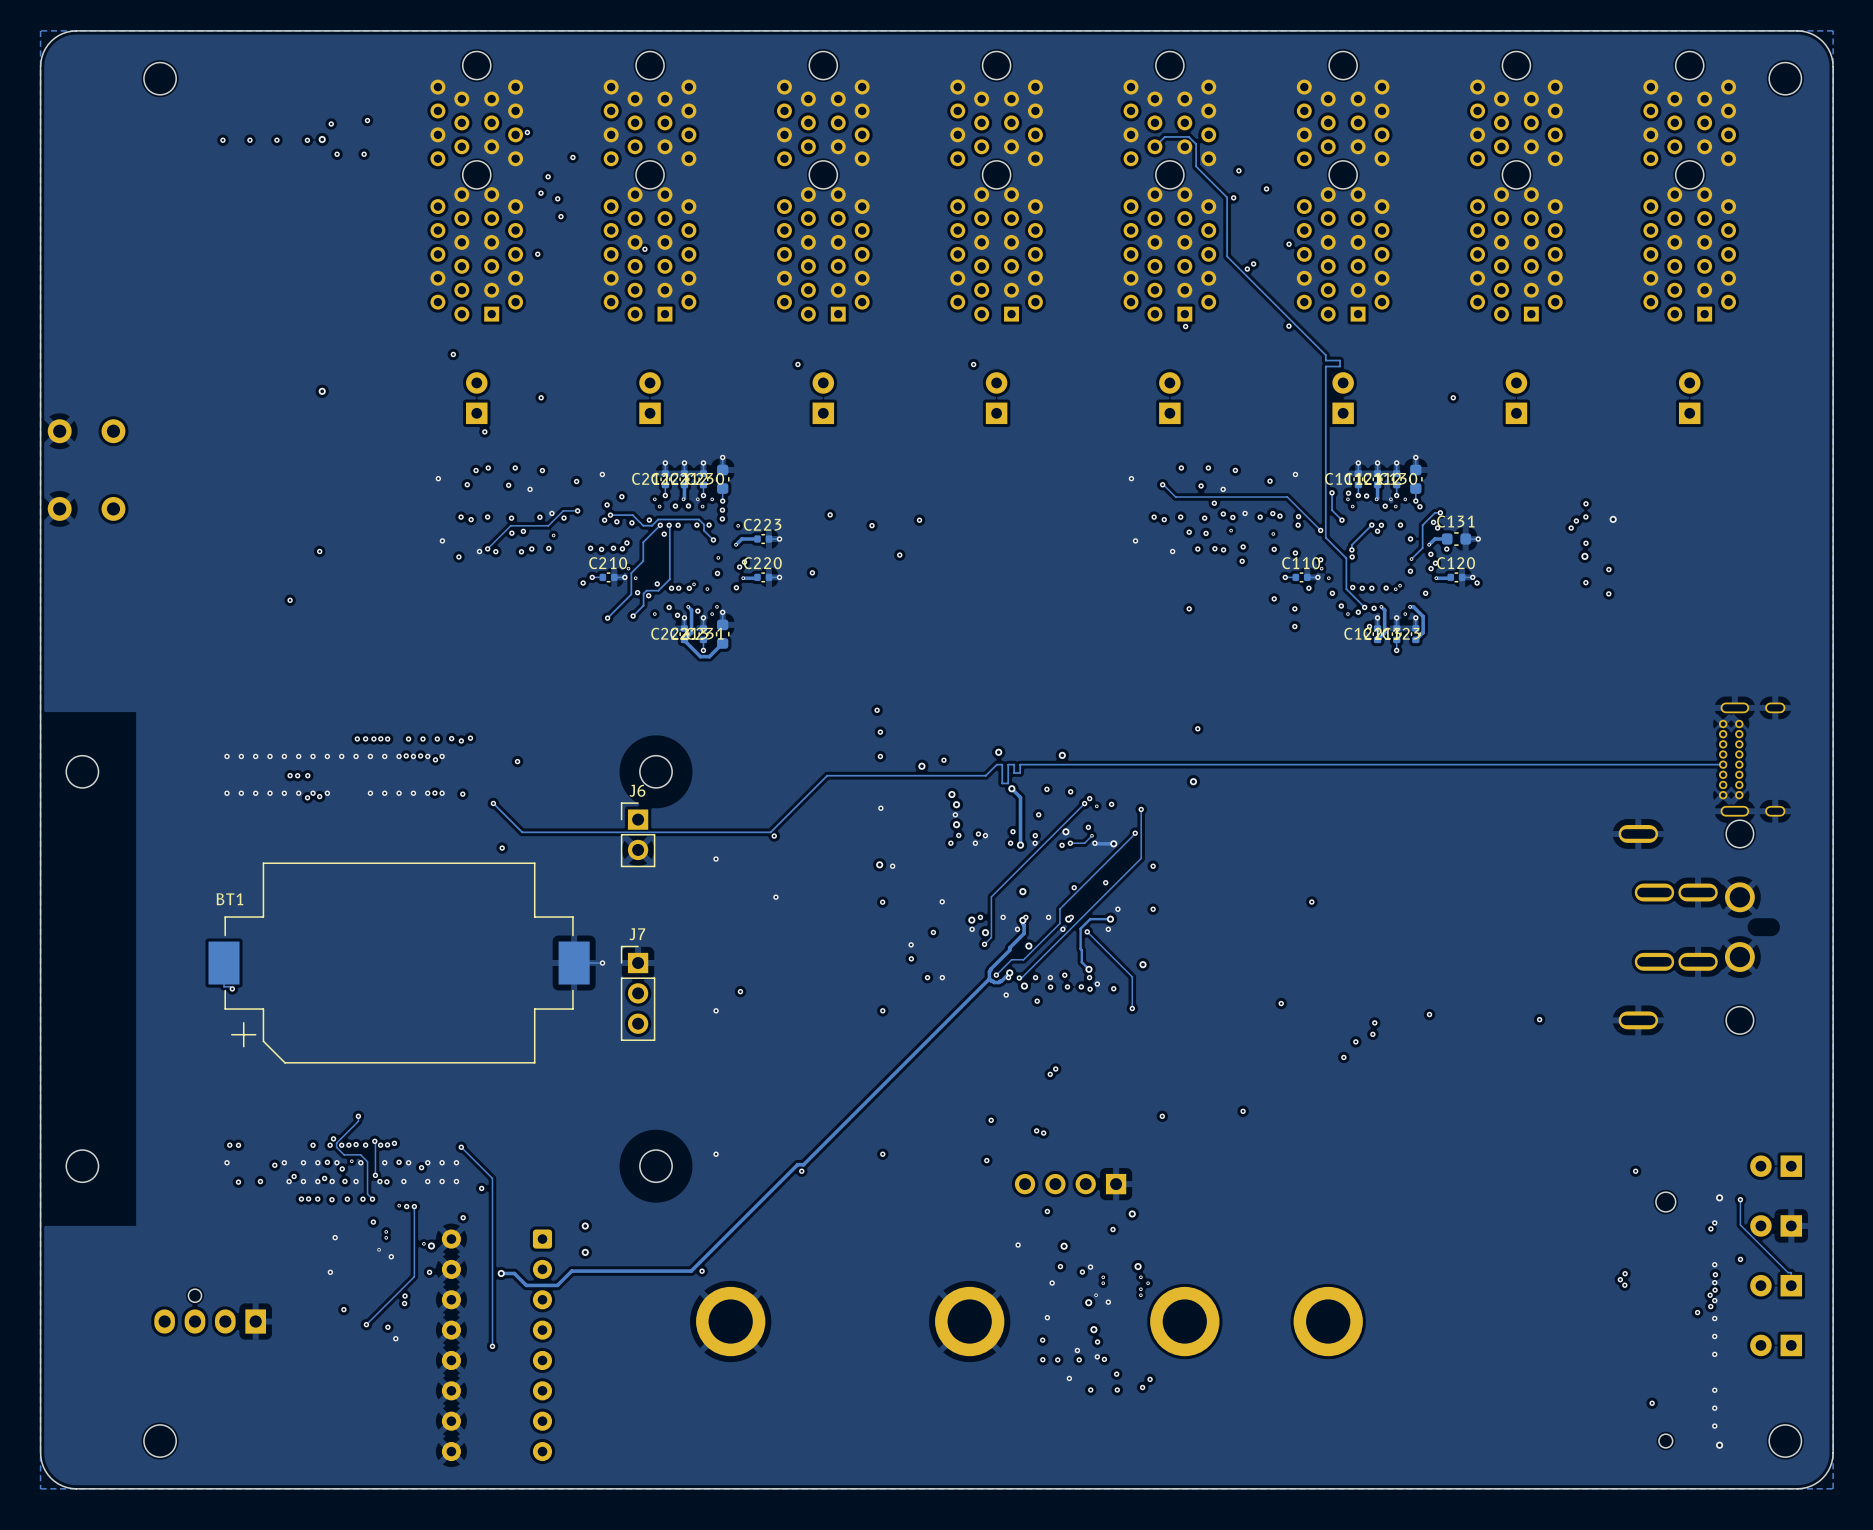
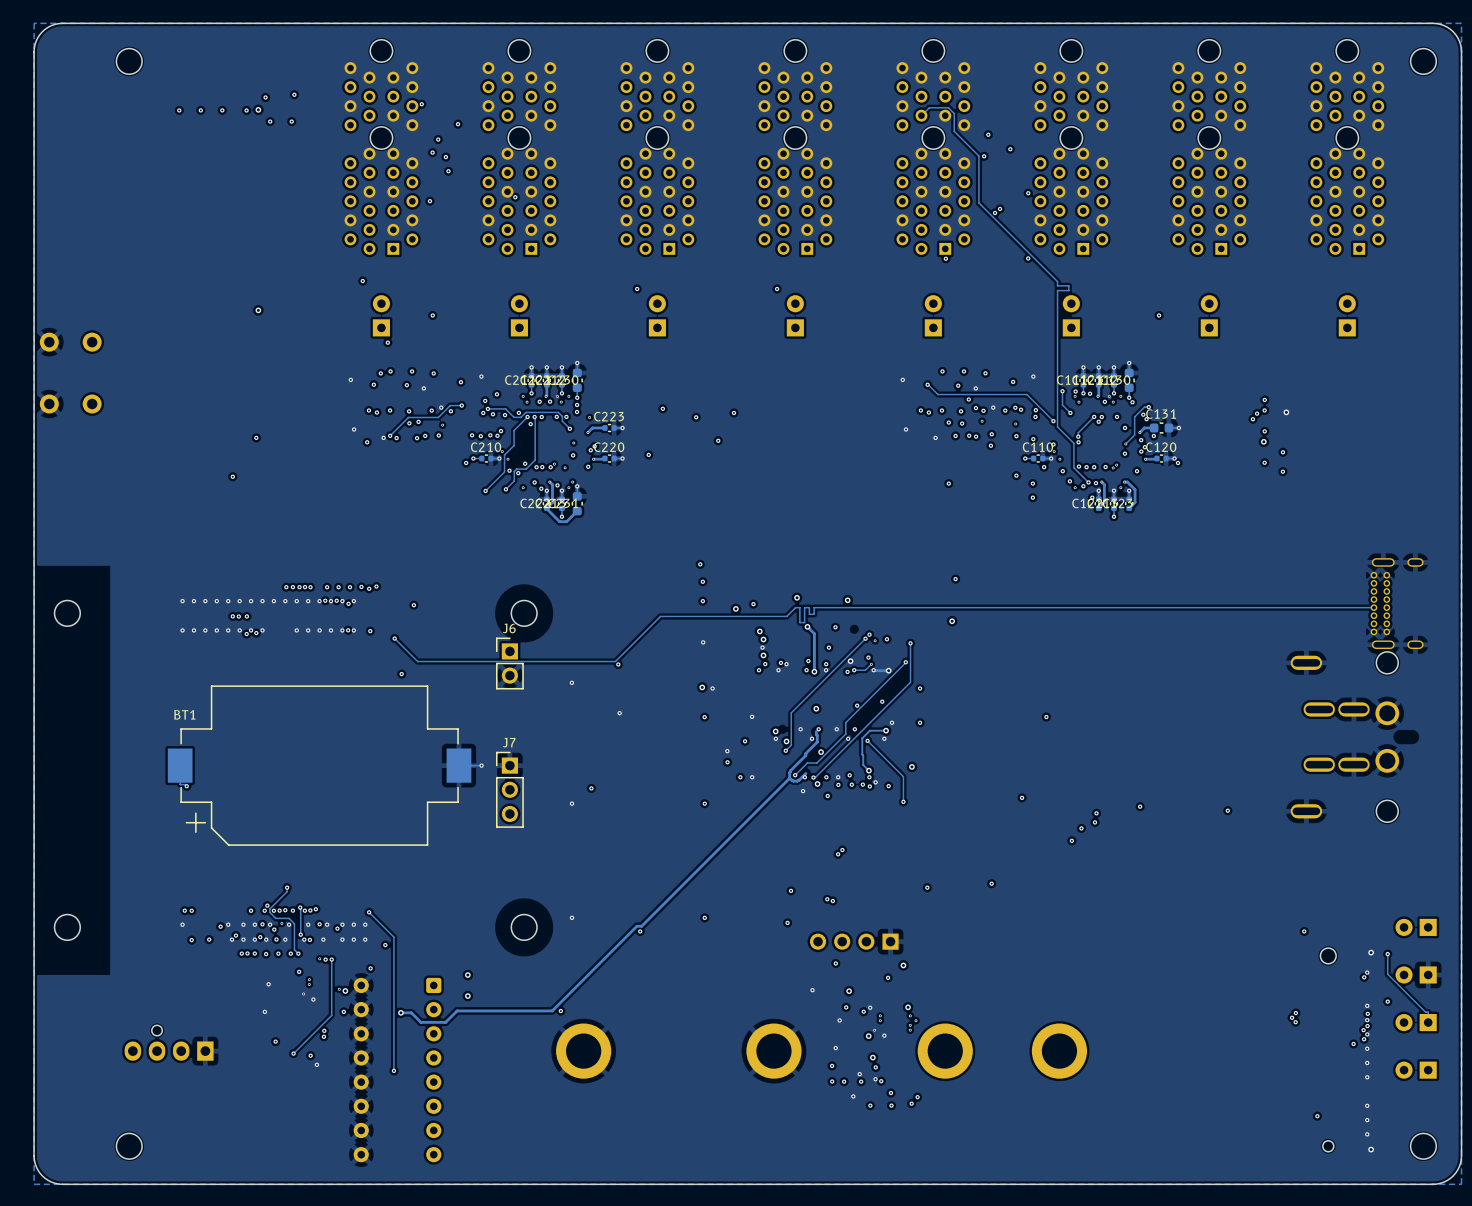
via: (1070, 791) -> none
via: (980, 917) -> none
via: (1068, 919) -> none
via: (1022, 920) -> none
via: (1009, 972) -> none

